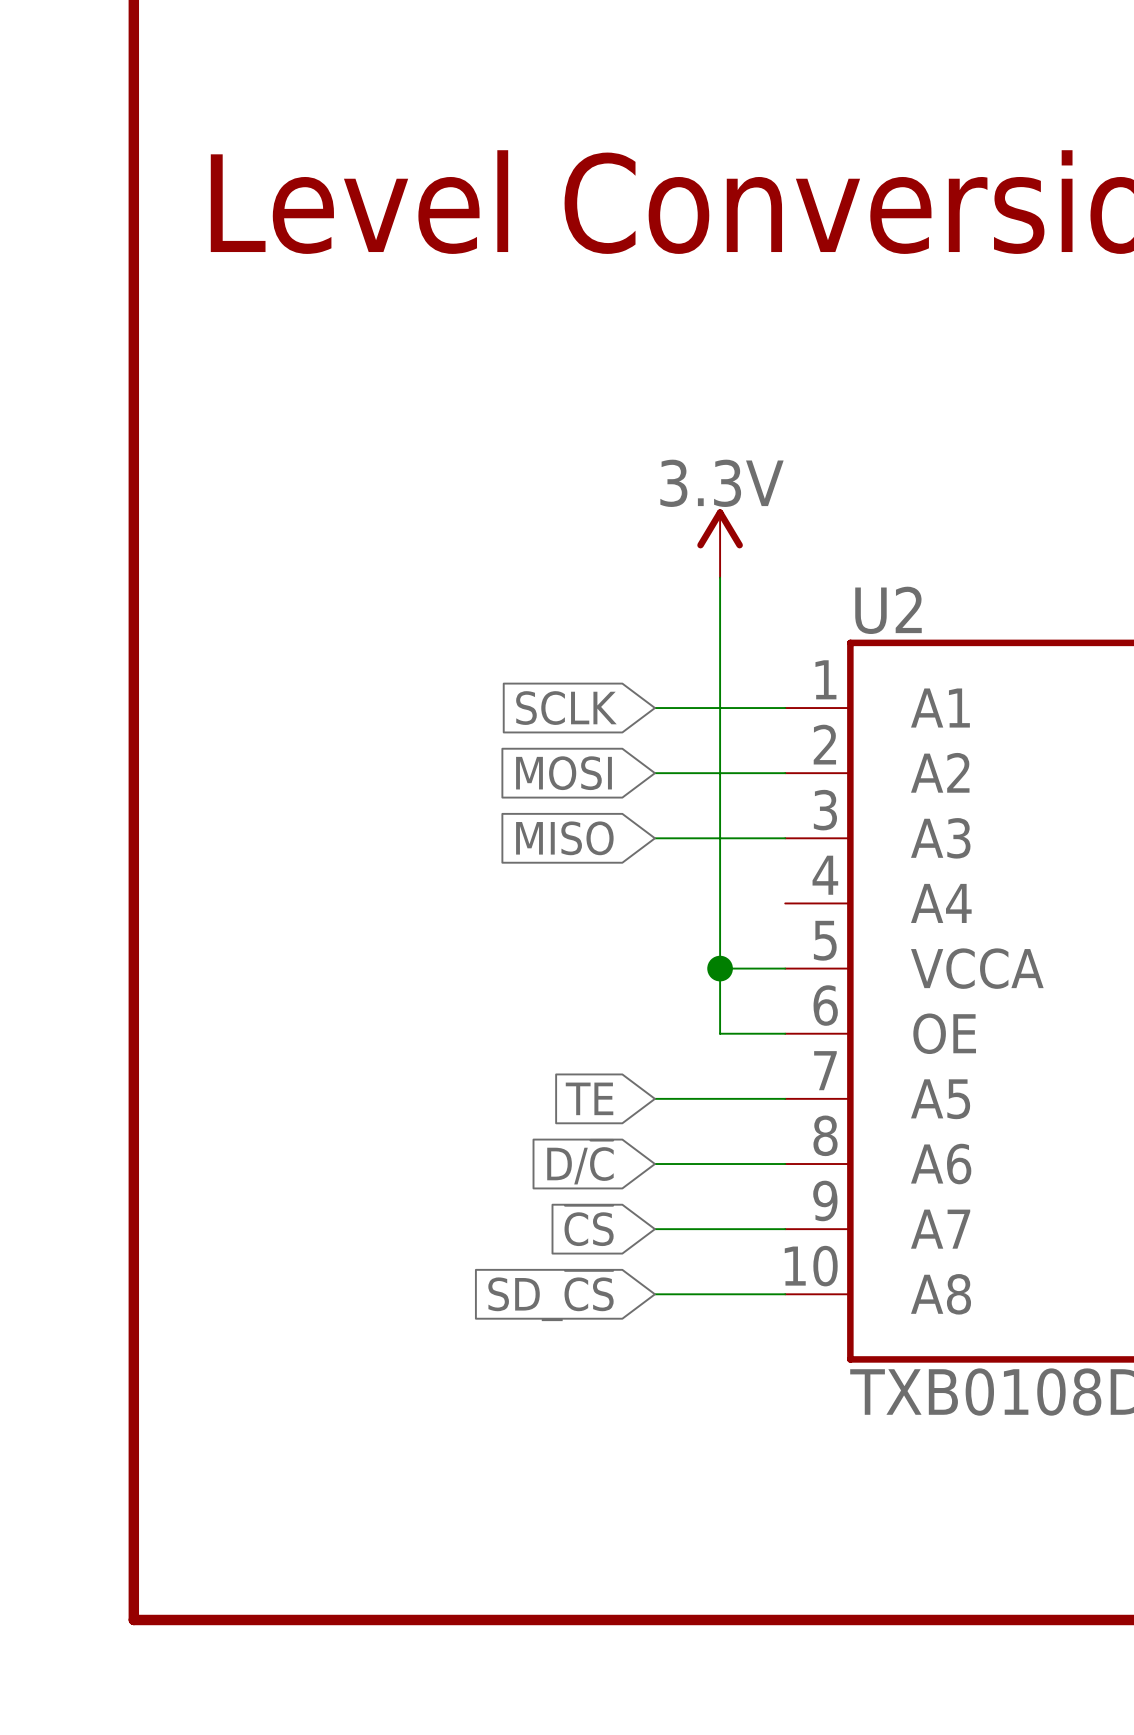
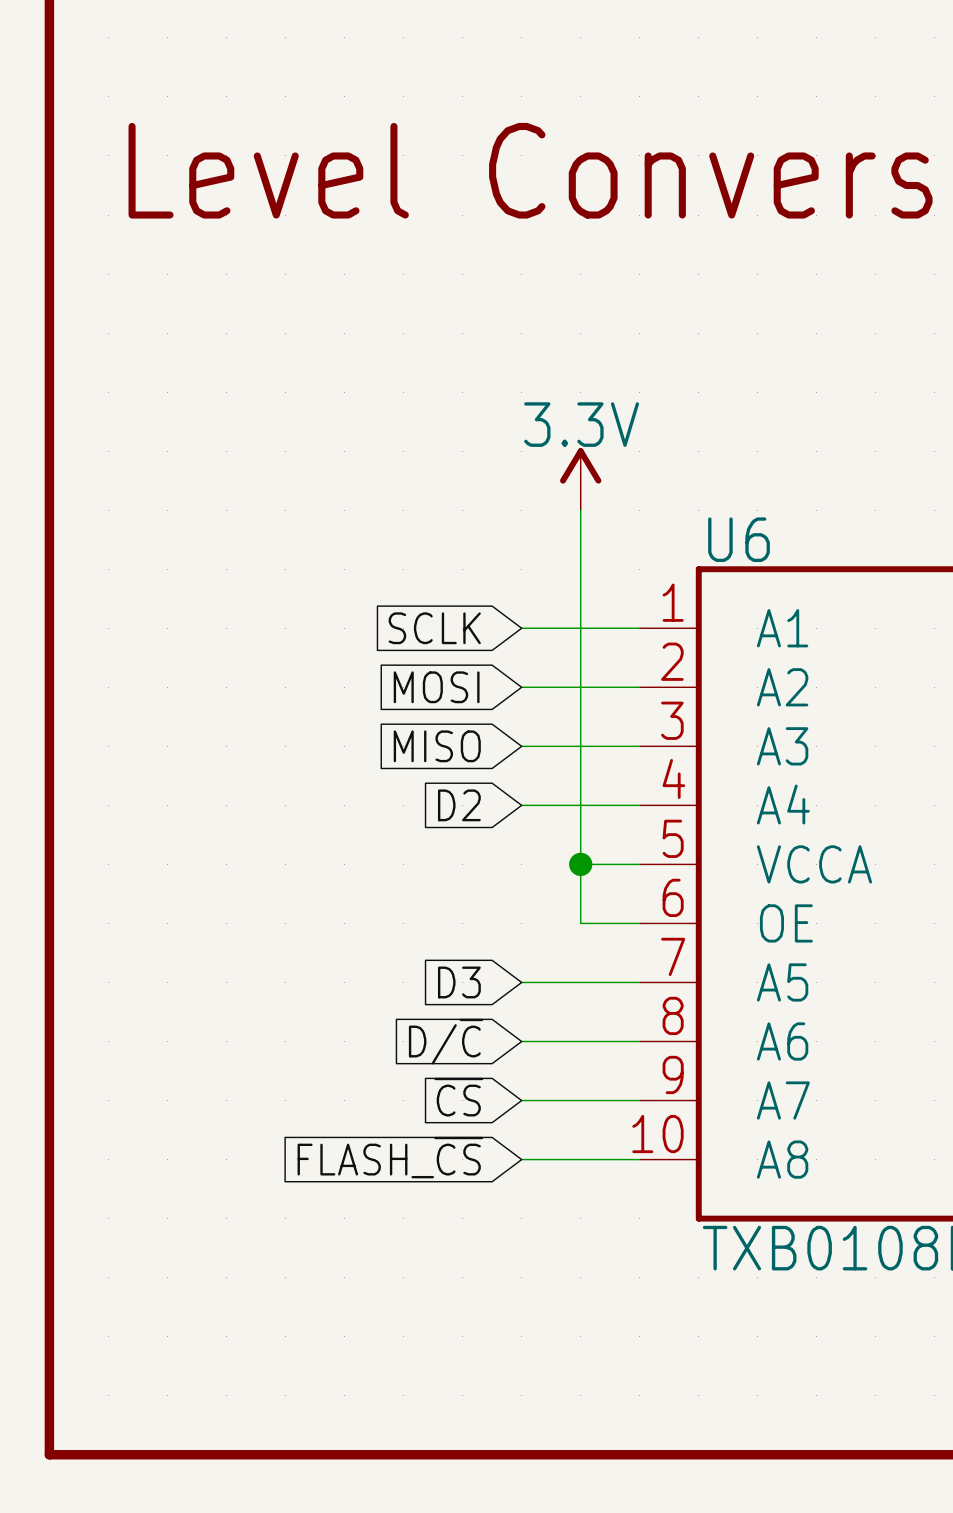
U2 name: U2 (888, 610) -> U6 (739, 539)
global label: none -> D2 (459, 805)
wire: none -> (521, 805) (639, 805)
global label: TE (589, 1098) -> D3 (459, 982)
global label: SD_~{CS} (550, 1295) -> FLASH_~{CS} (390, 1157)

